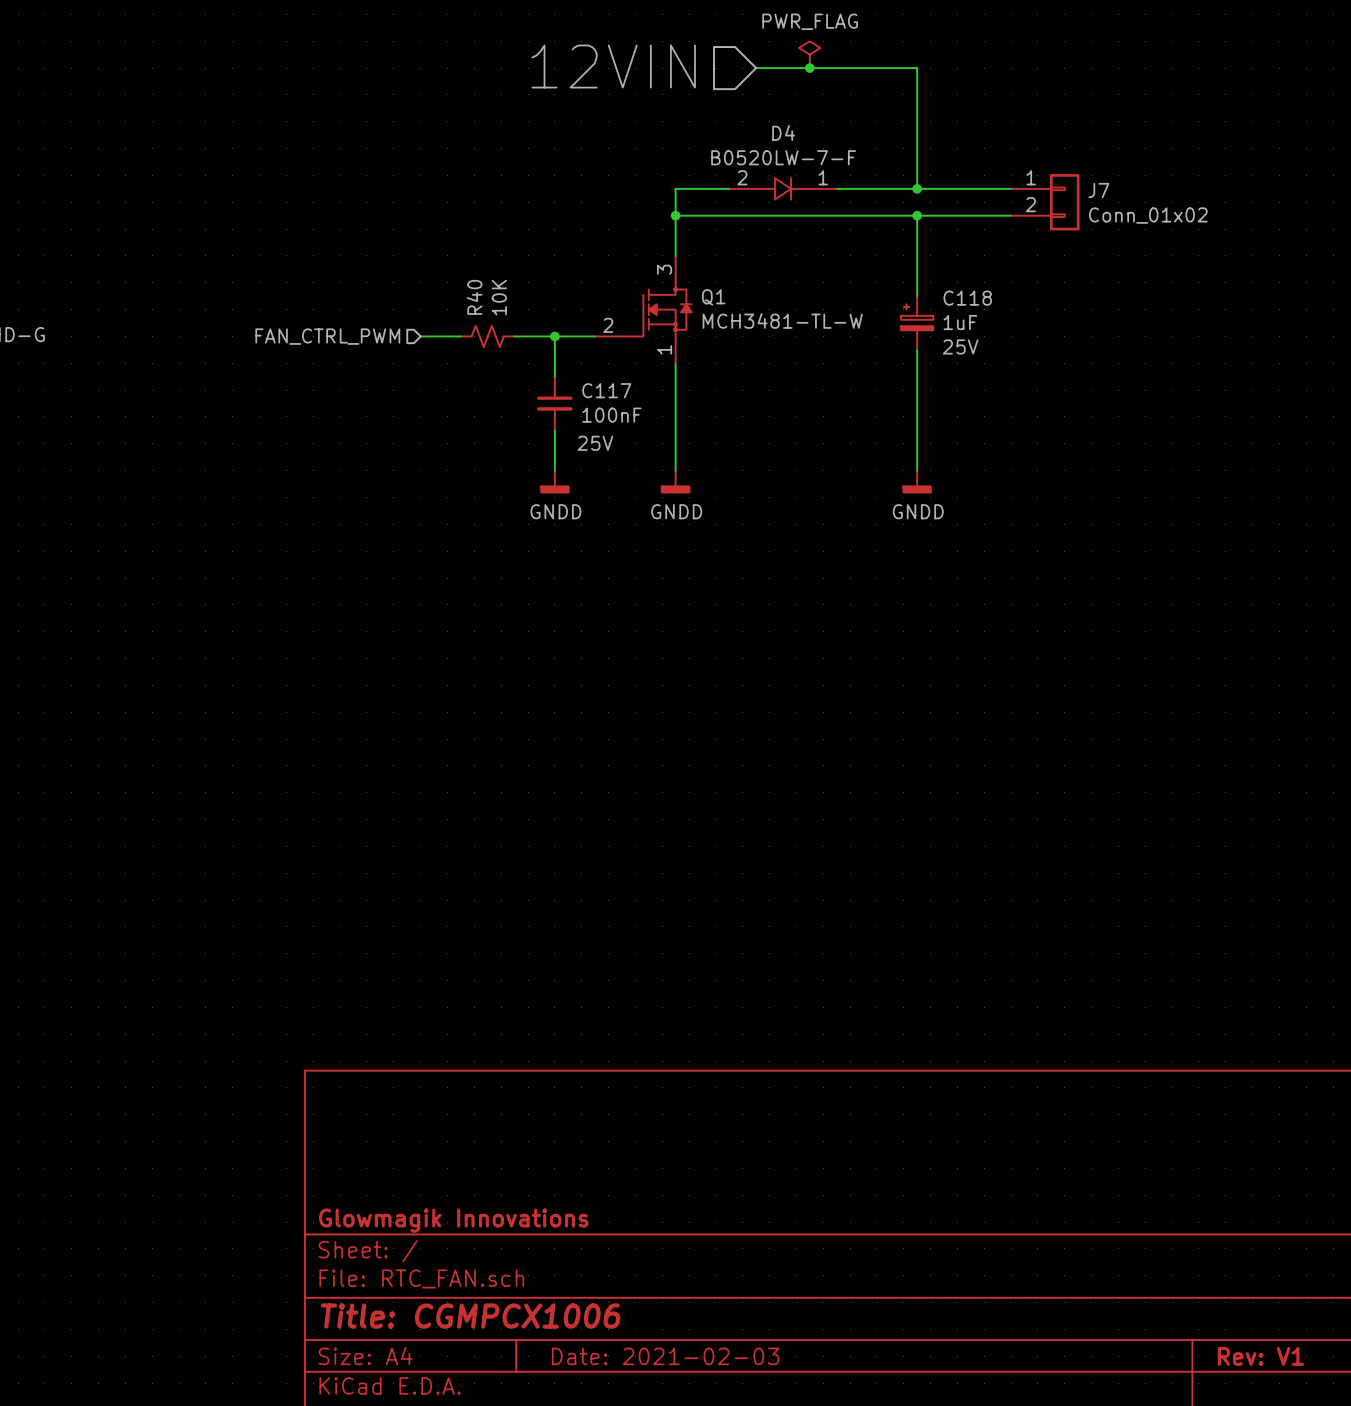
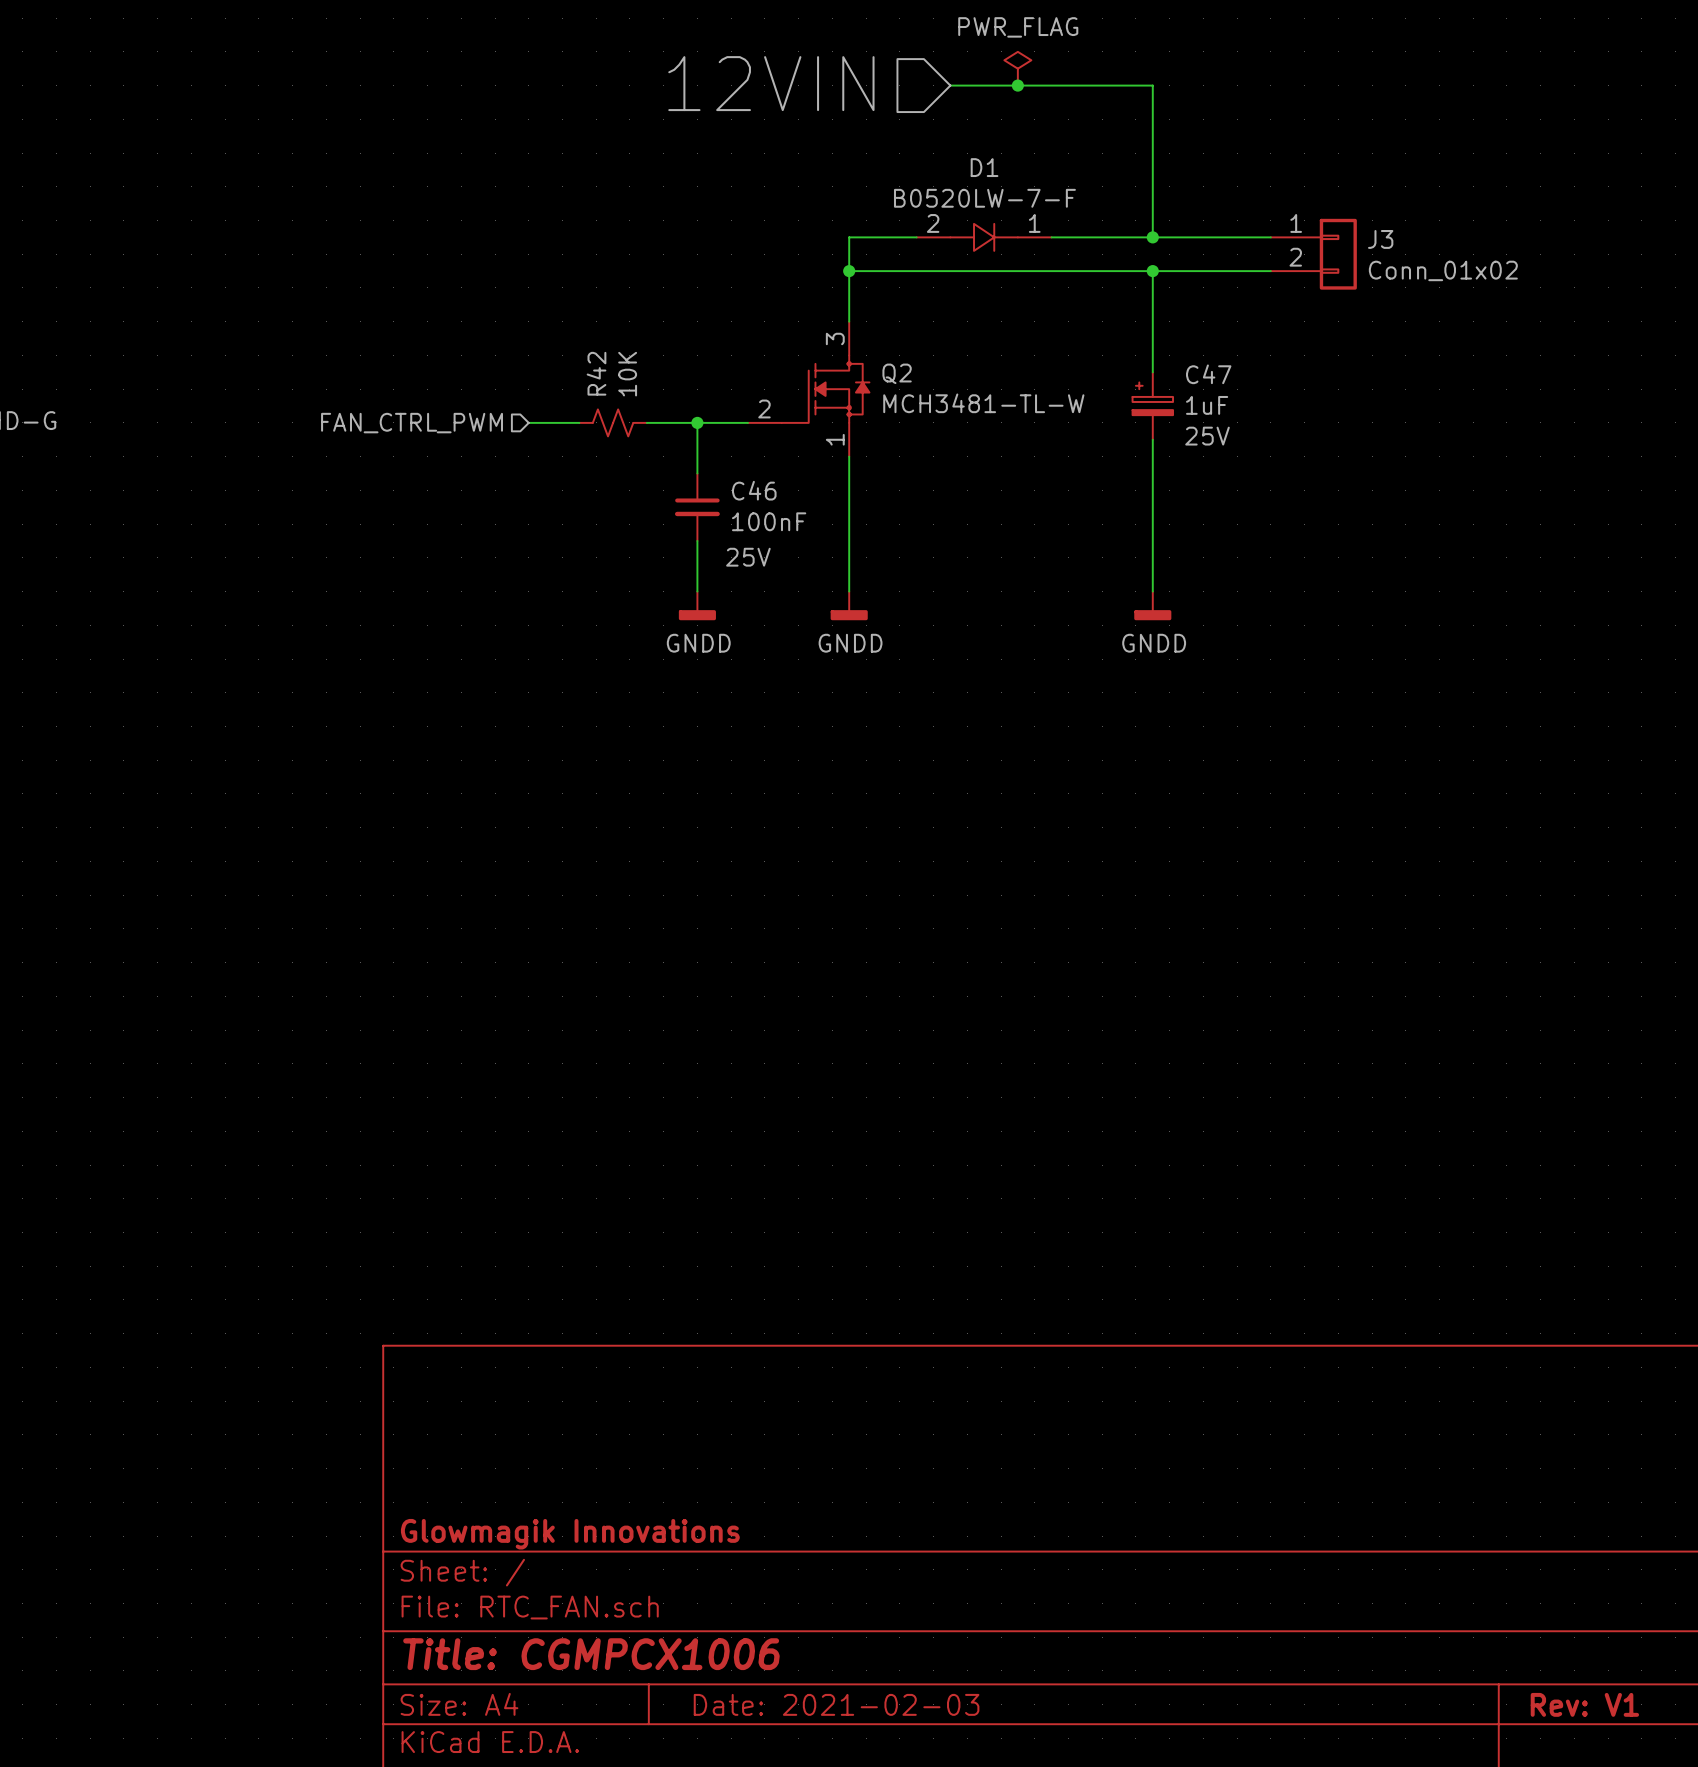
D4 name: D4 (783, 133) -> D1 (984, 167)
J7 name: J7 (1098, 190) -> J3 (1380, 239)
R40 name: R40 (474, 297) -> R42 (596, 373)
Q1 name: Q1 (713, 297) -> Q2 (897, 373)
C118 name: C118 (967, 298) -> C47 (1208, 374)
C117 name: C117 (606, 390) -> C46 (754, 490)

